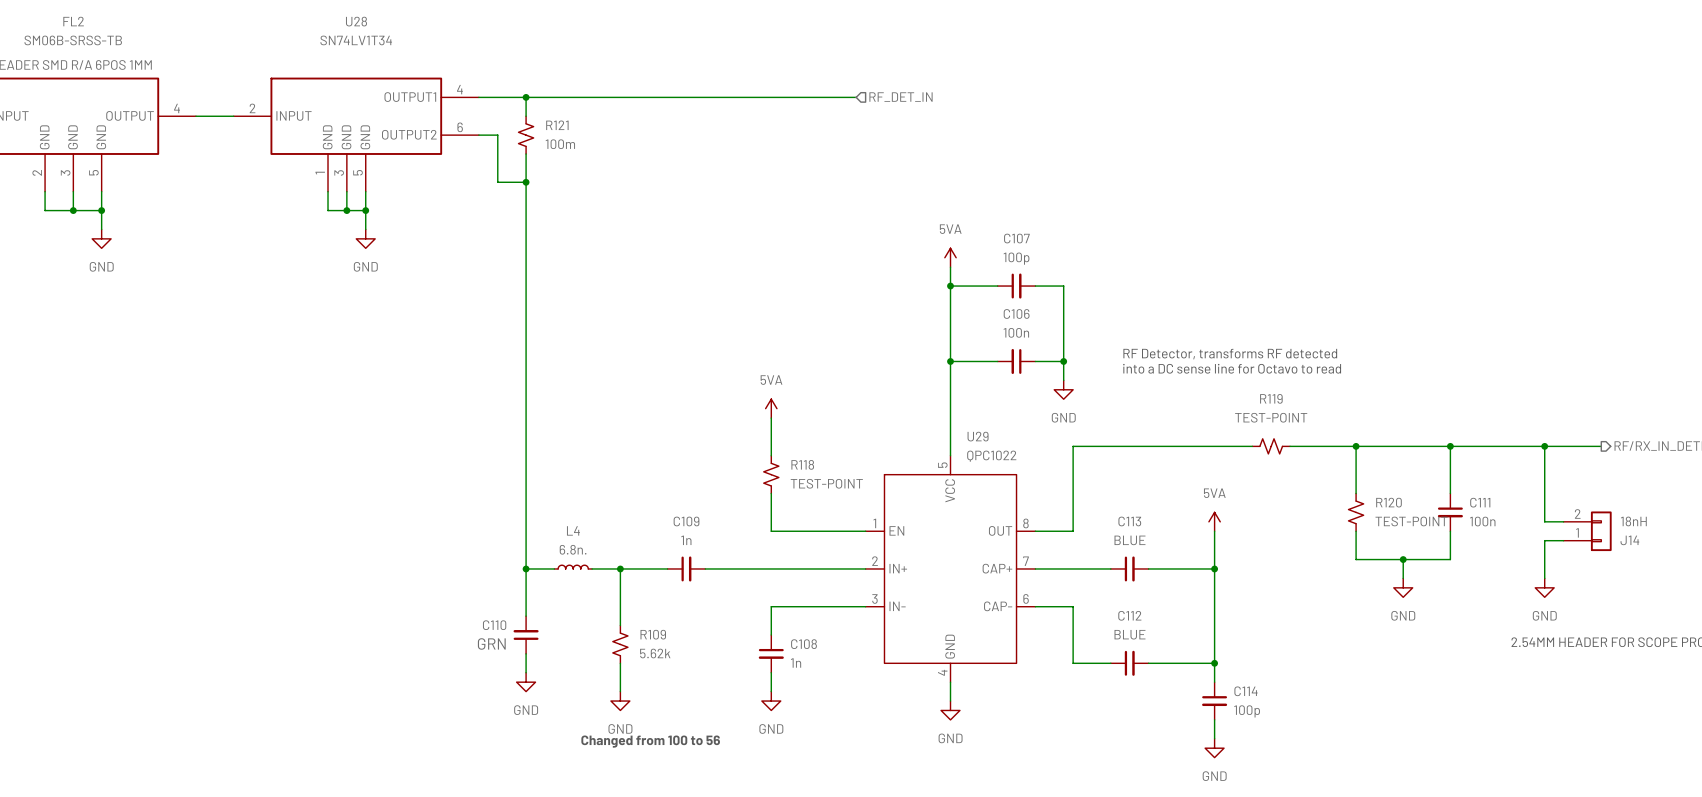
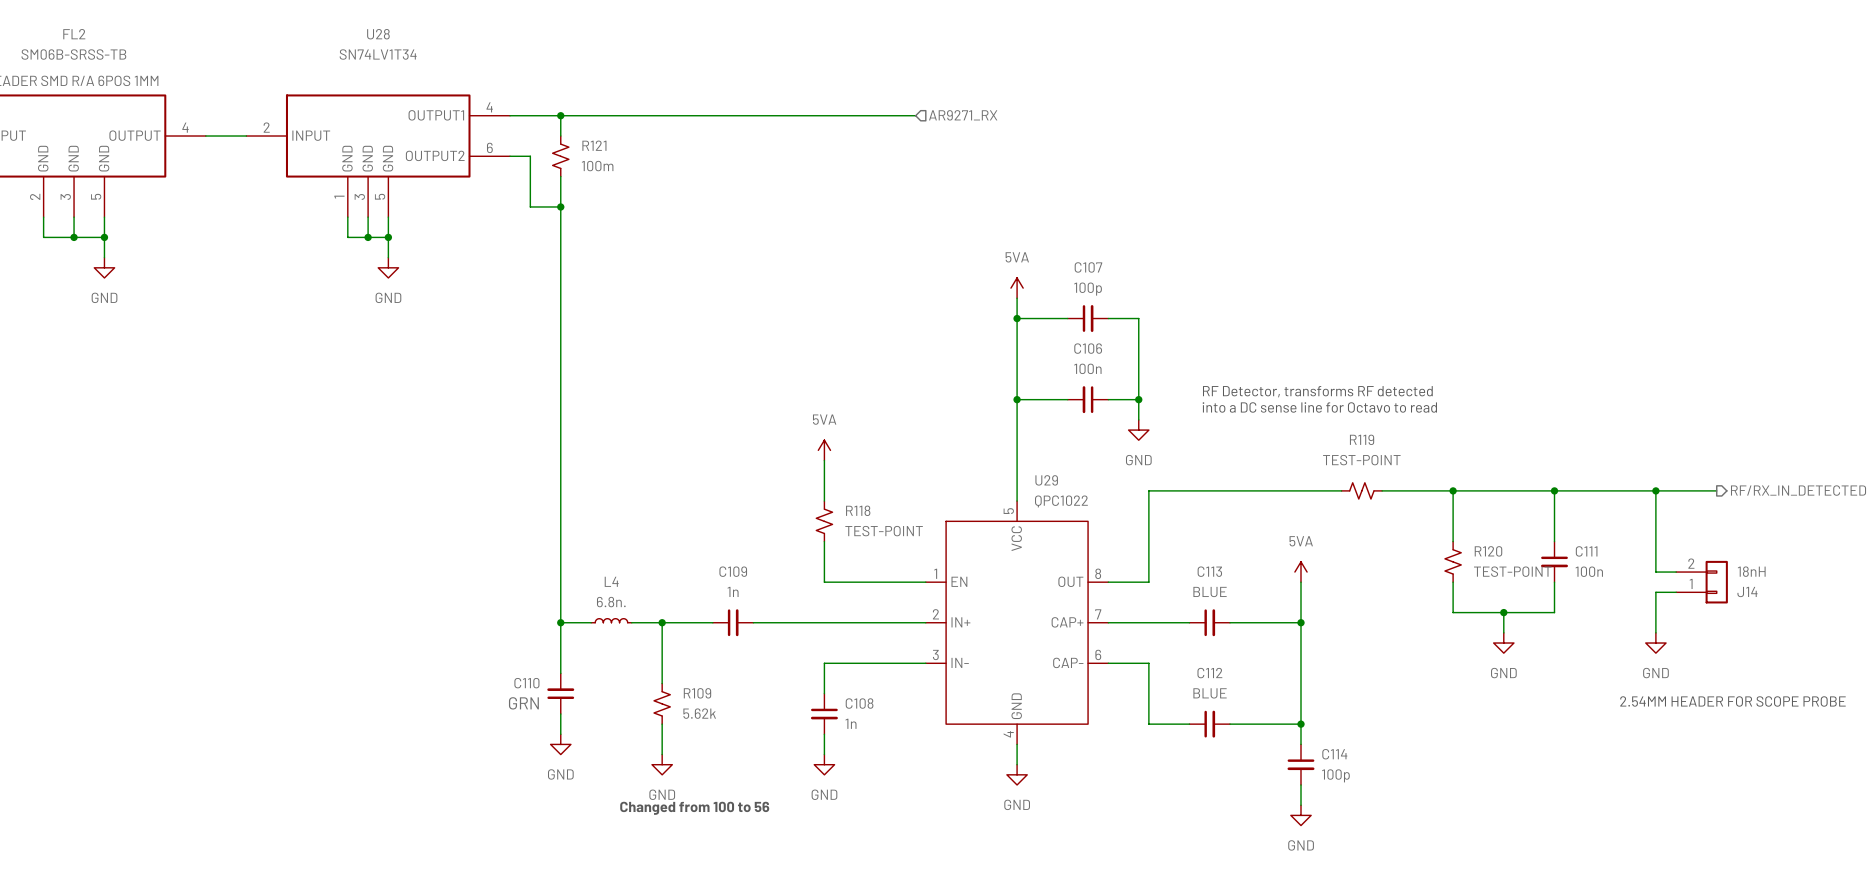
hierarchical label: RF_DET_IN (901, 97) -> AR9271_RX (963, 115)

